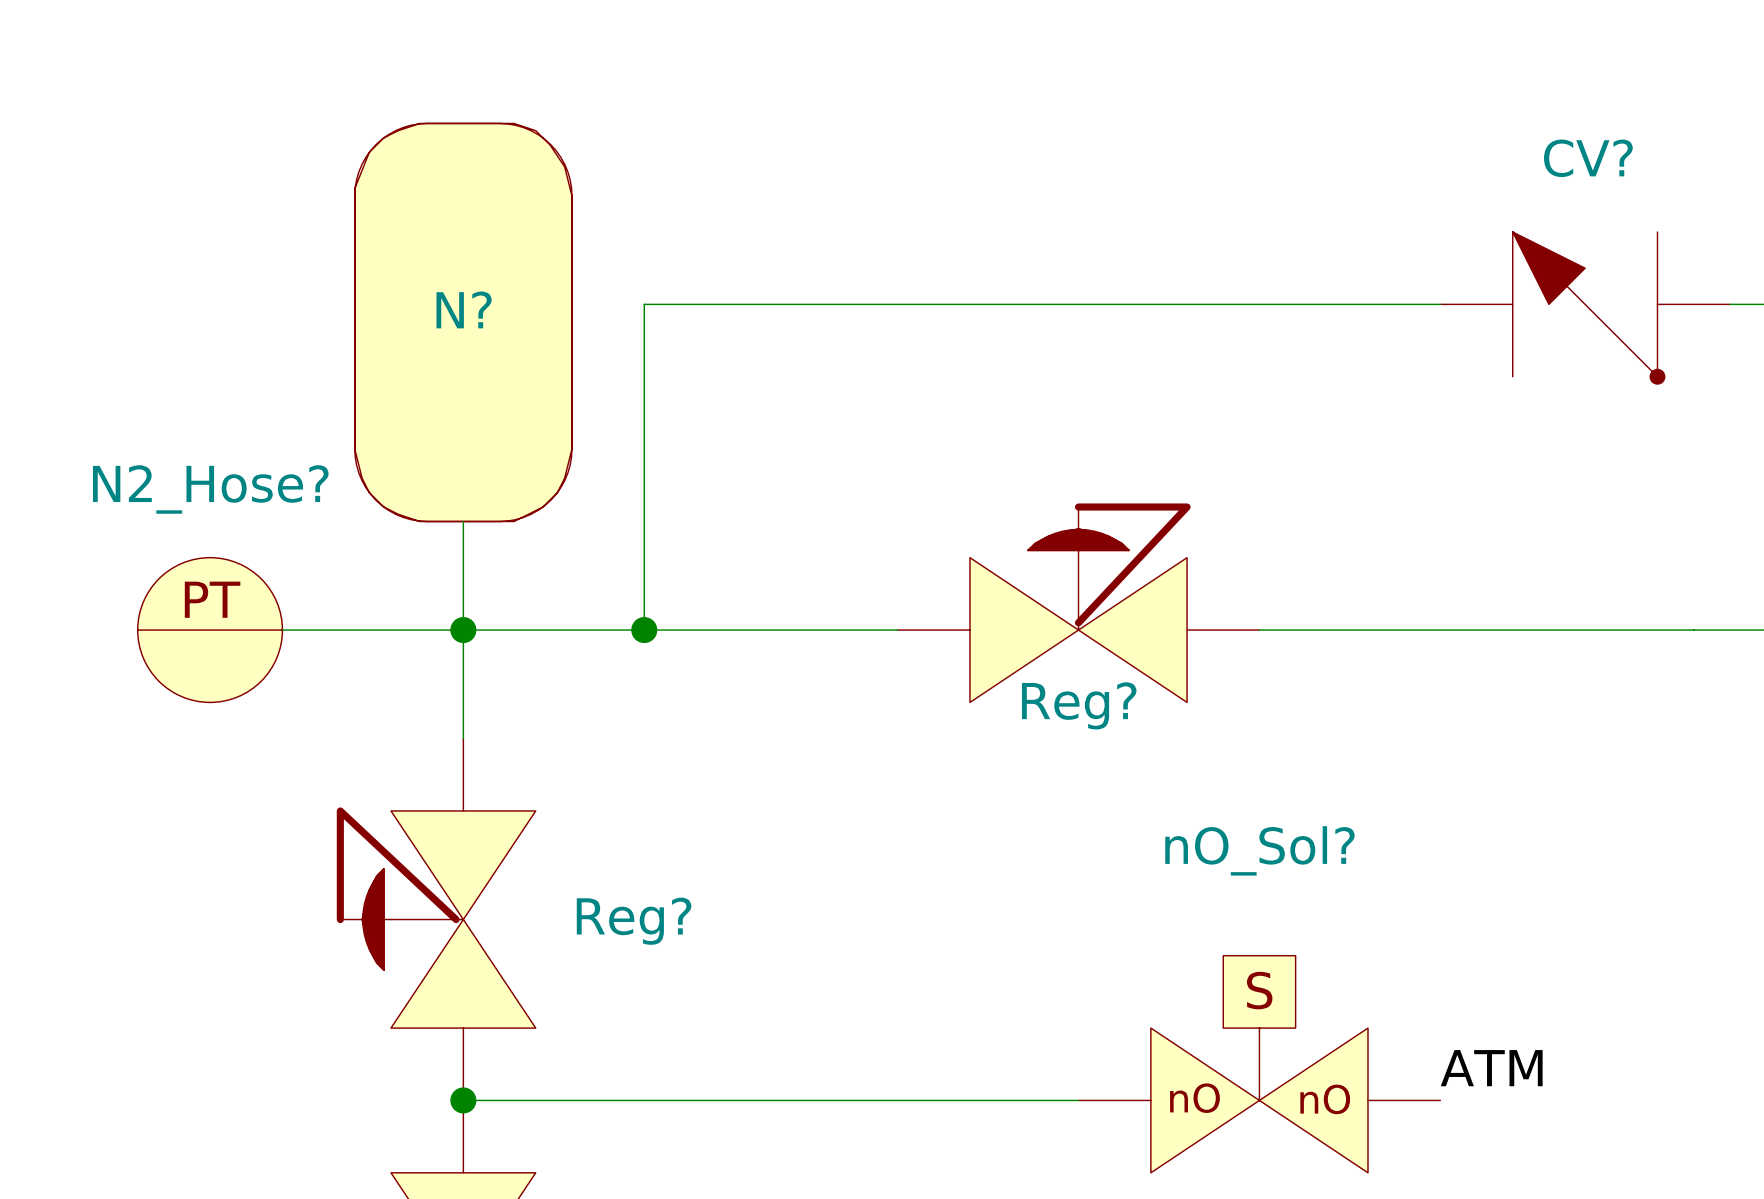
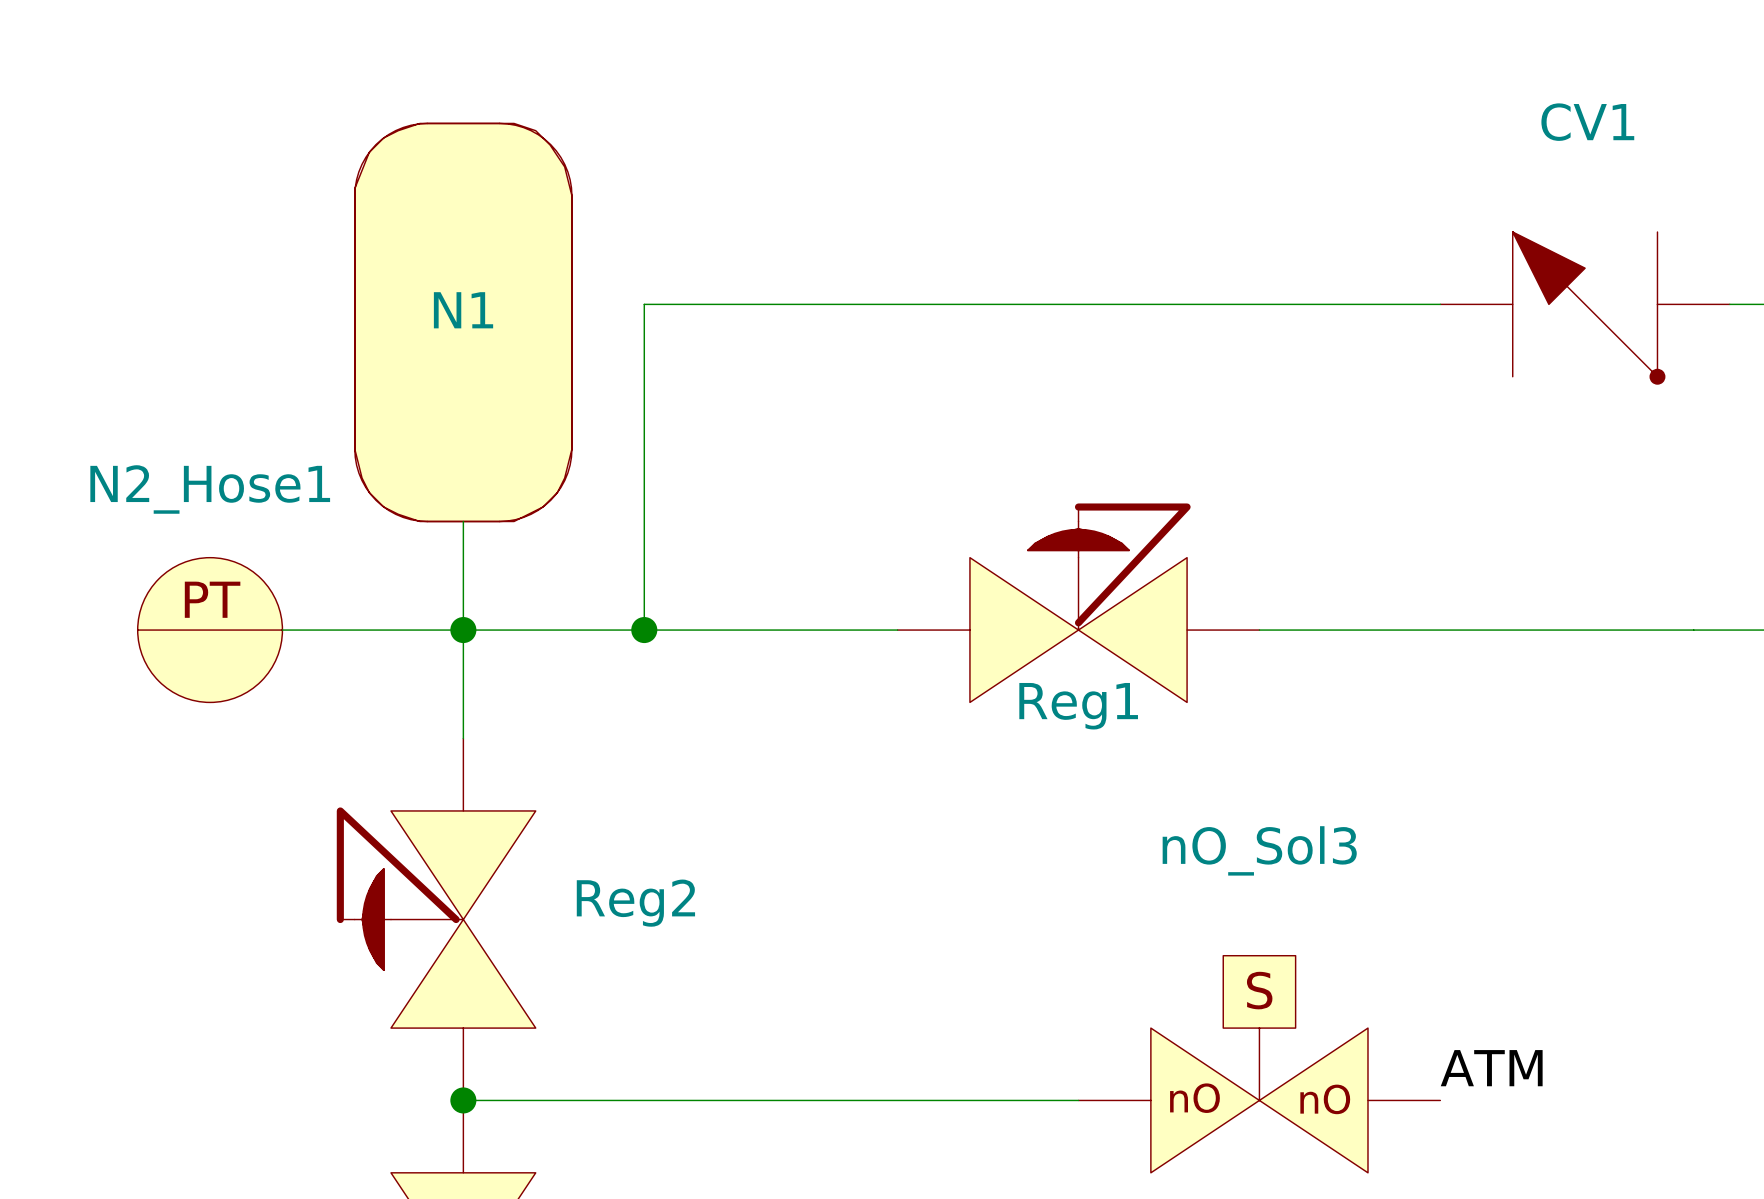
CV? name: CV? (1588, 158) -> CV1 (1587, 122)
N? name: N? (464, 309) -> N1 (463, 310)
N2_Hose? name: N2_Hose? (210, 489) -> N2_Hose1 (210, 489)
Reg? name: Reg? (1079, 705) -> Reg1 (1078, 706)
nO_Sol? name: nO_Sol? (1259, 850) -> nO_Sol3 (1259, 850)
Reg? name: Reg? (634, 921) -> Reg2 (635, 903)

